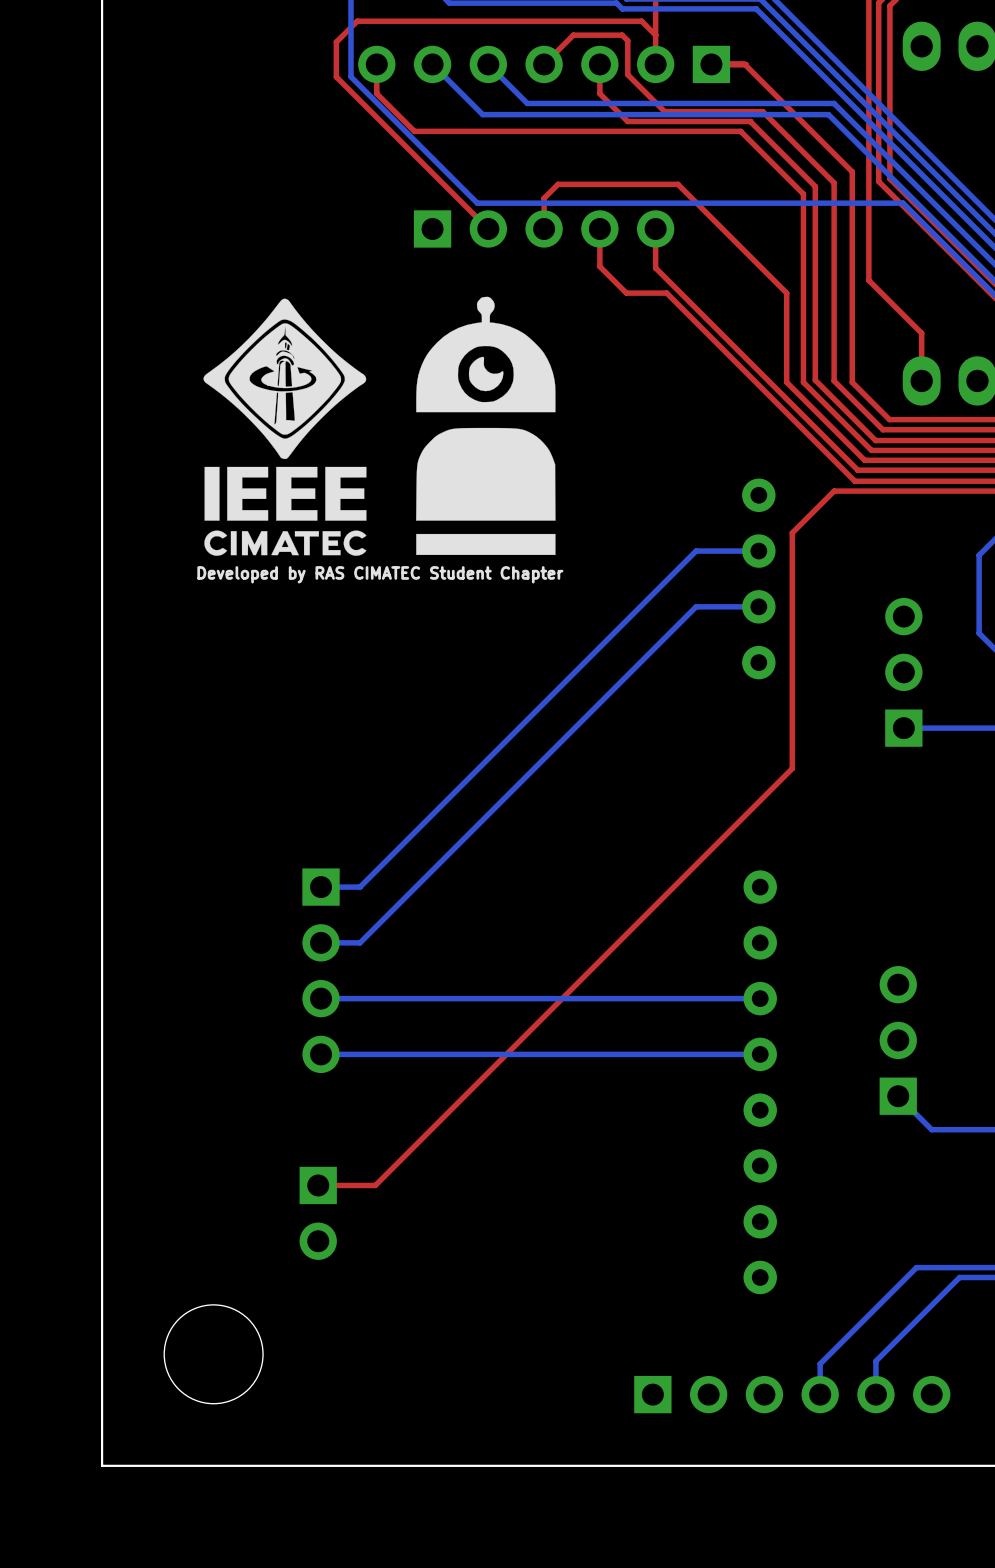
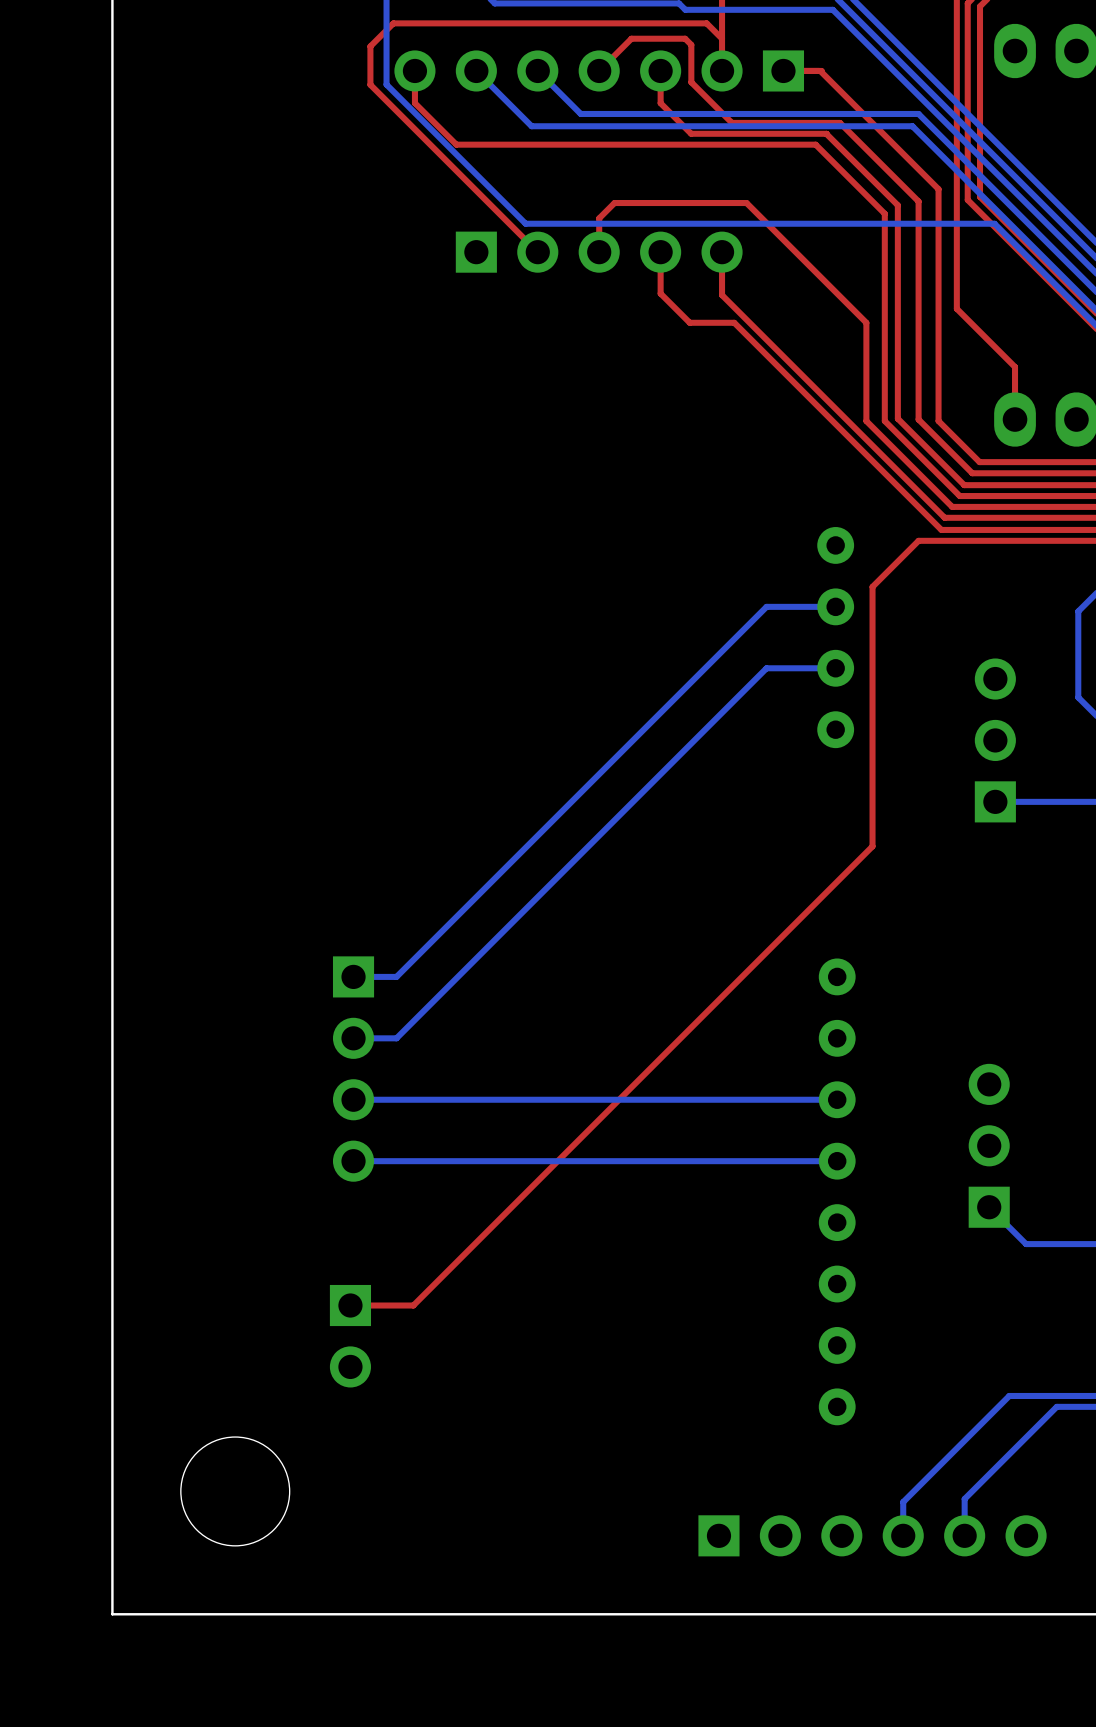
drawing: [416, 296, 556, 556] -> none
drawing: [203, 298, 367, 556] -> none
text: Developed by RAS CIMATEC Student Chapter (380, 574) -> none

